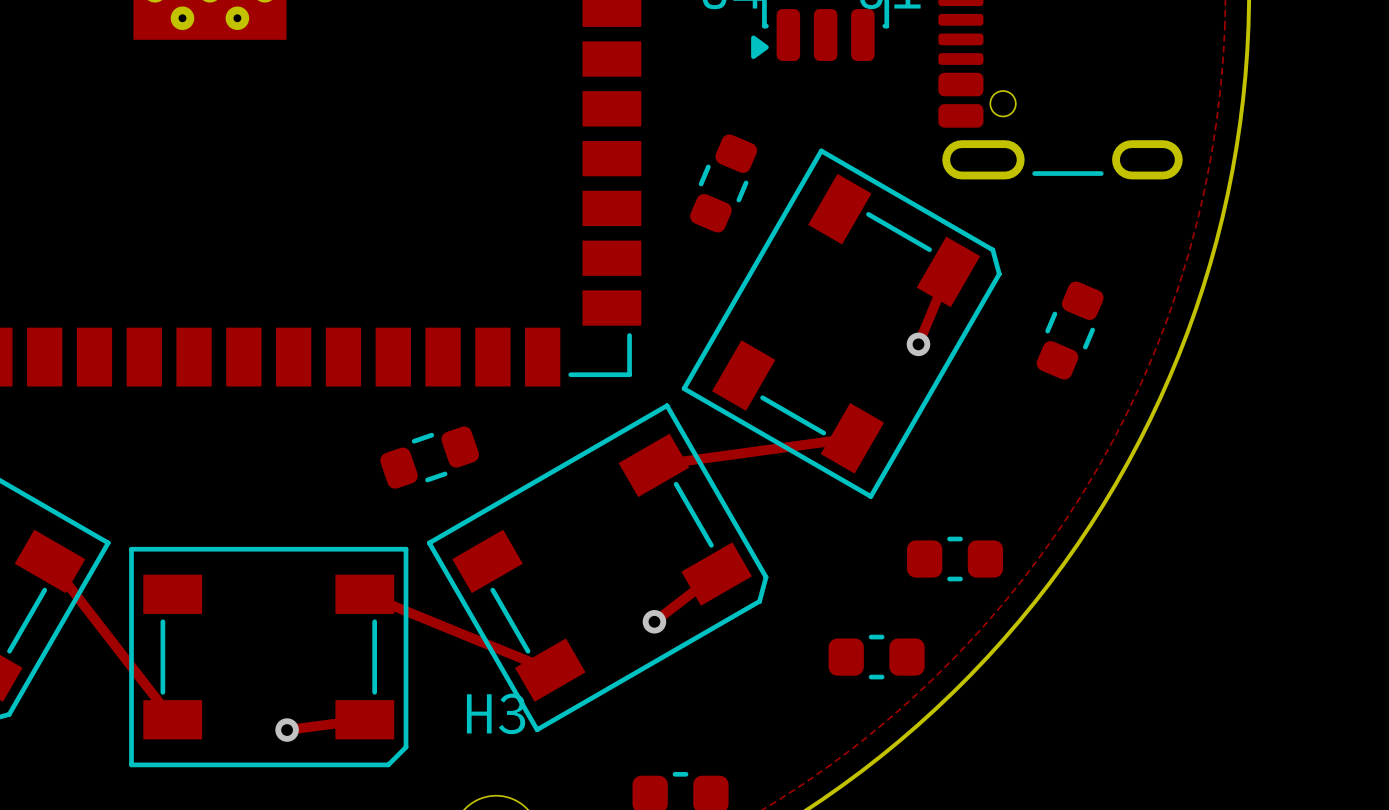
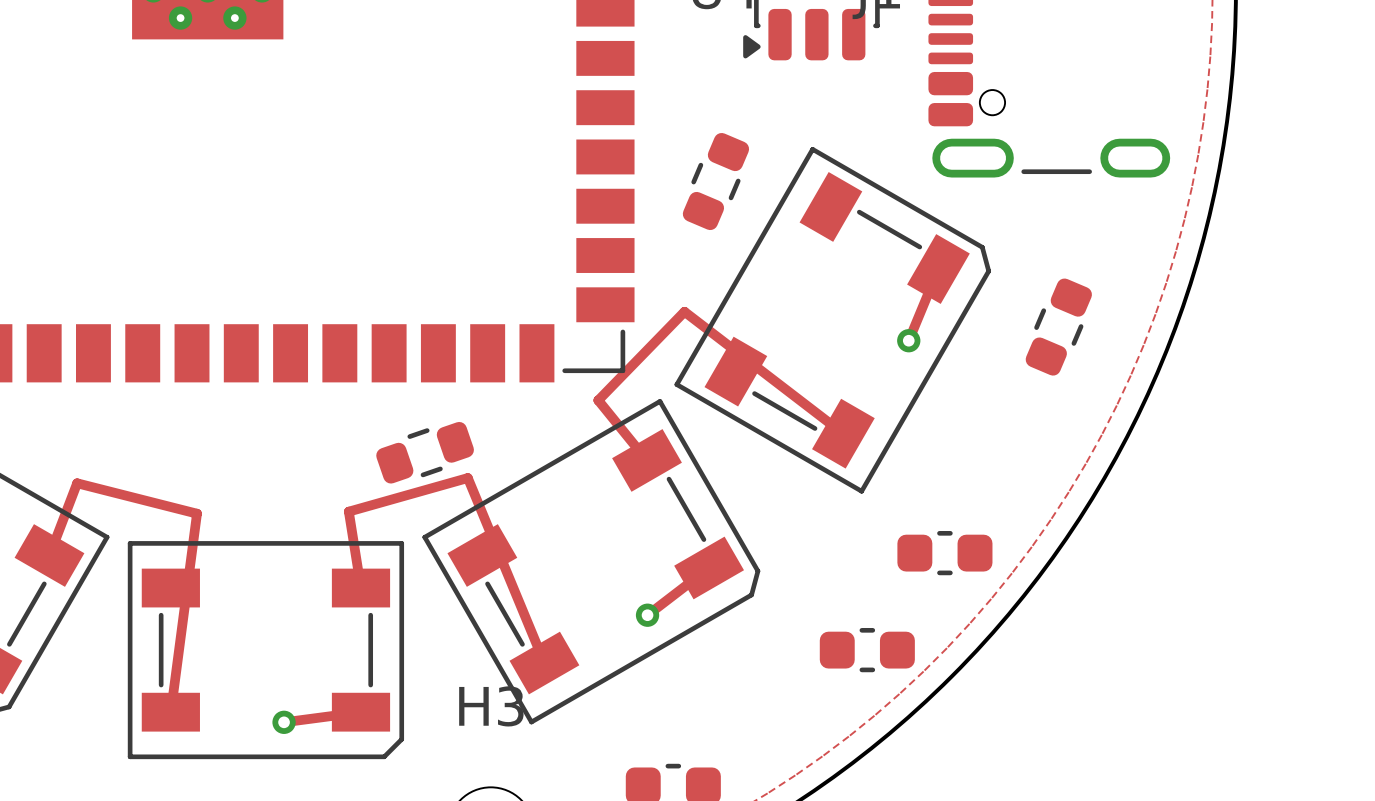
track: (852, 438) (653, 465) -> (843, 433) (684, 311) (598, 400) (647, 460)
track: (50, 561) (172, 719) -> (49, 555) (77, 483) (197, 513) (170, 712)
track: (364, 594) (550, 670) -> (360, 588) (348, 511) (467, 478) (544, 663)

